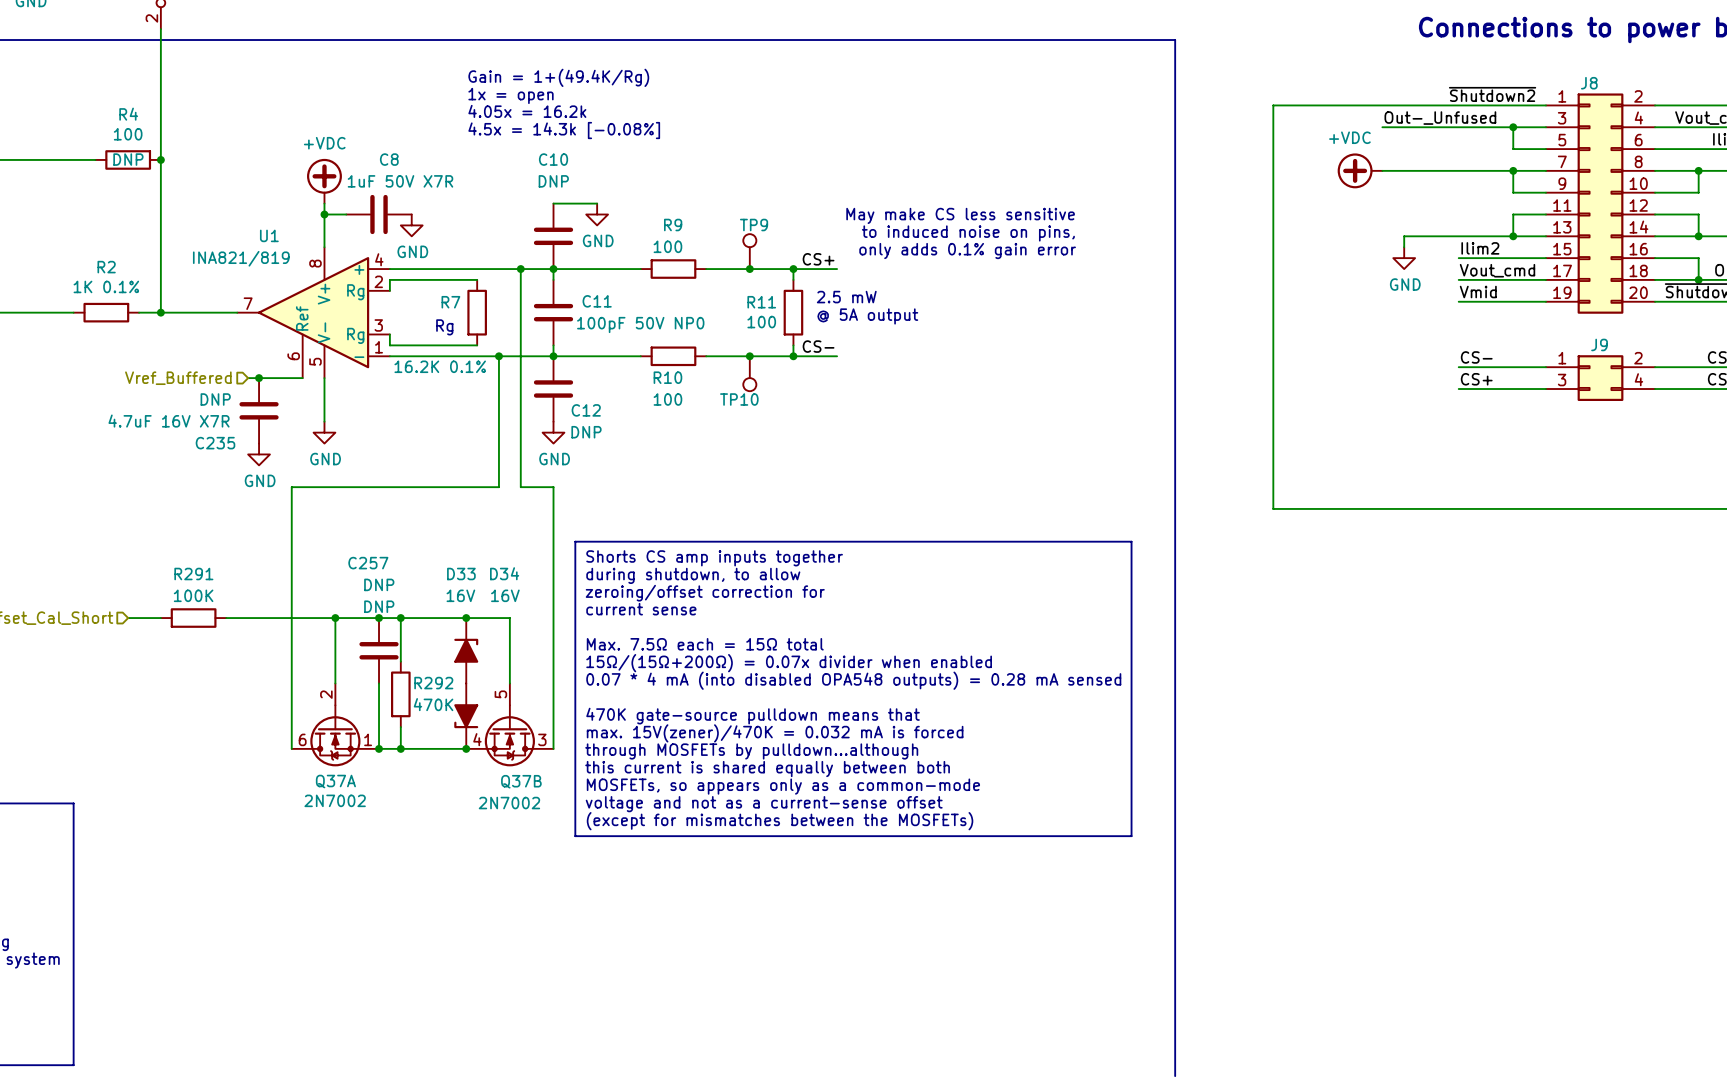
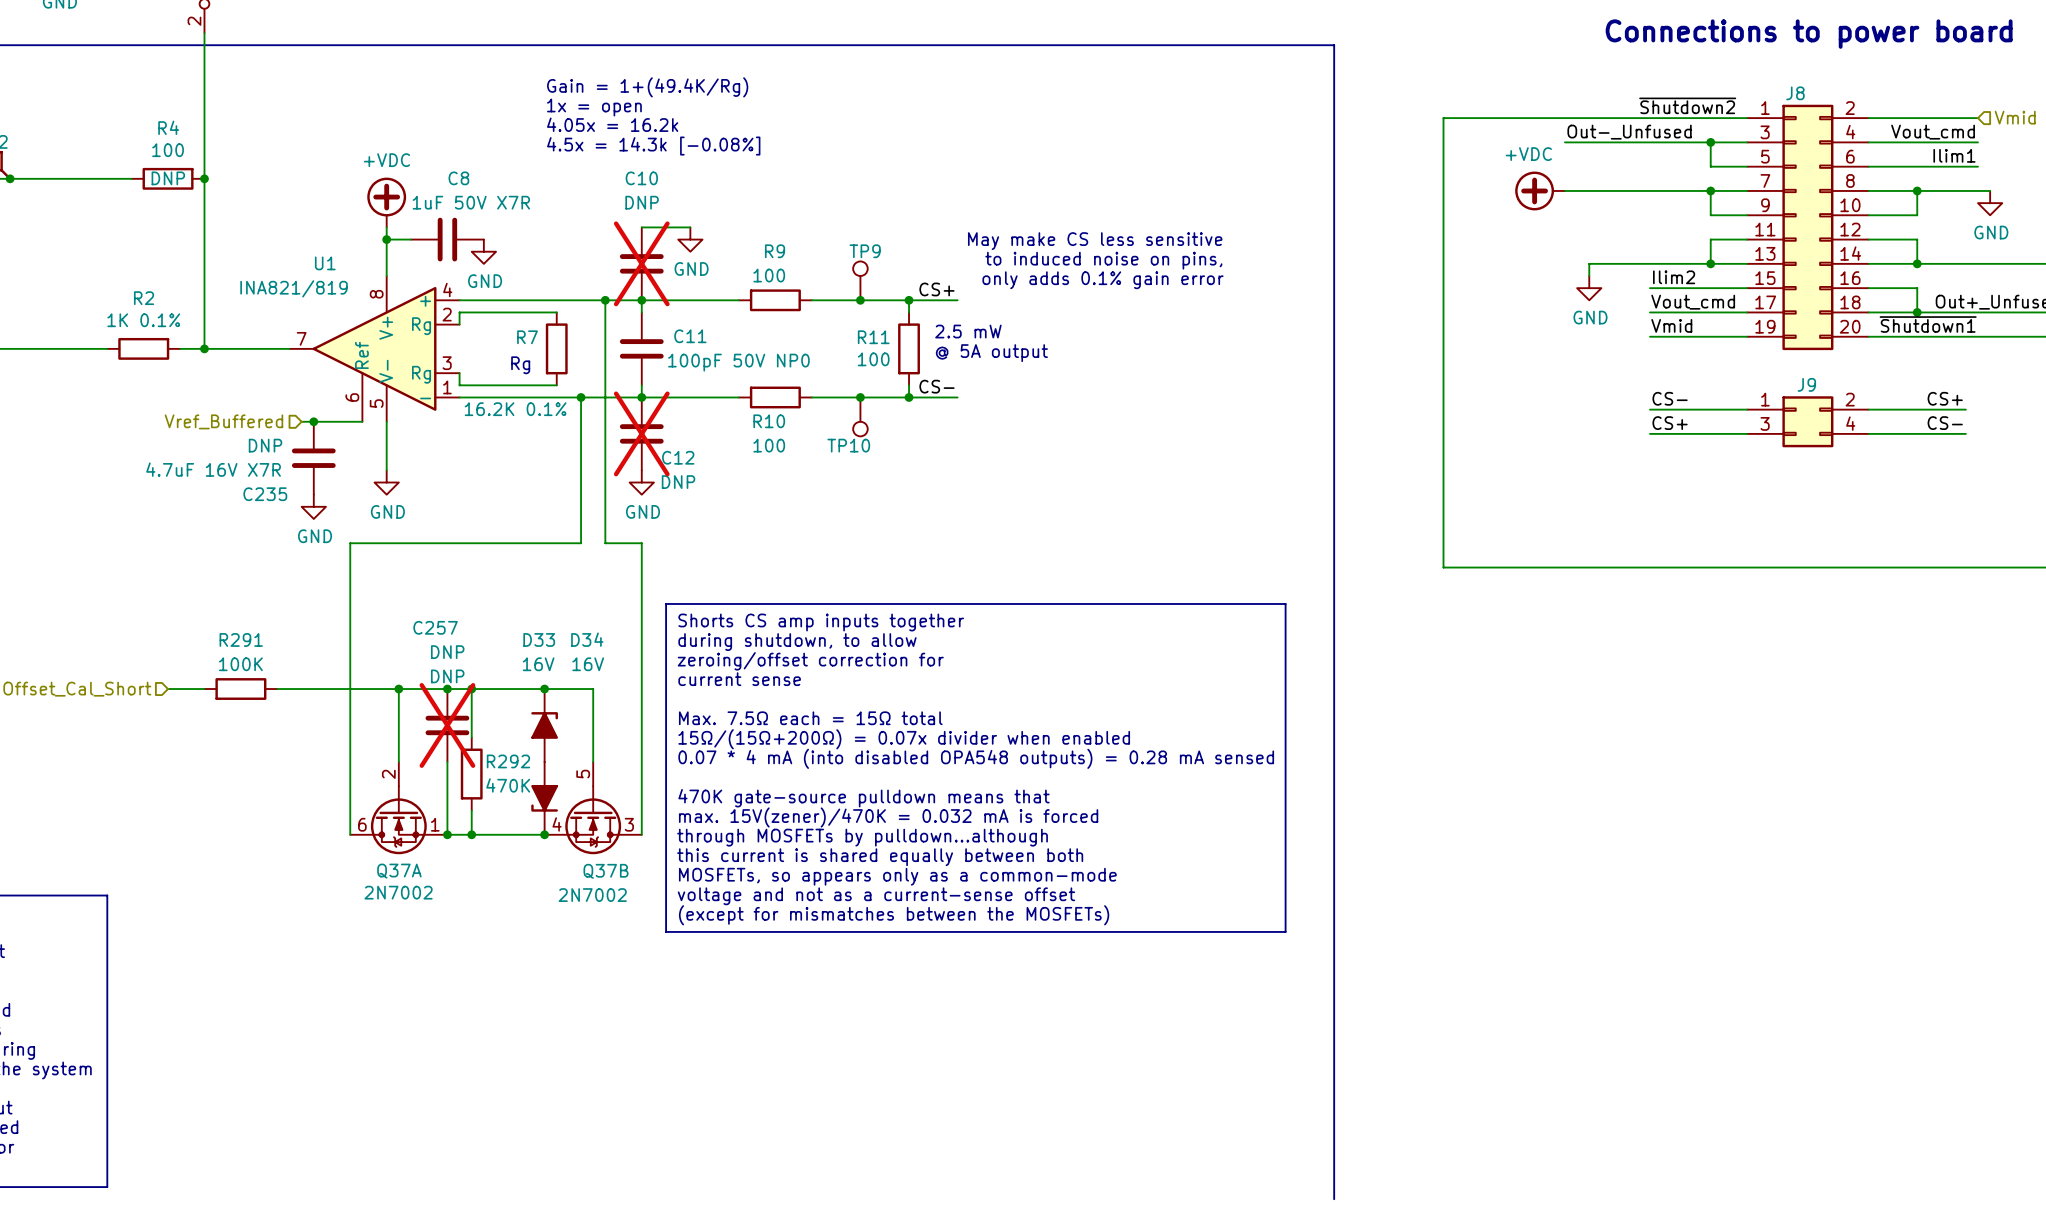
C10 do-not-place cross: none -> (641, 263)
C12 do-not-place cross: none -> (641, 433)
C257 do-not-place cross: none -> (447, 725)

